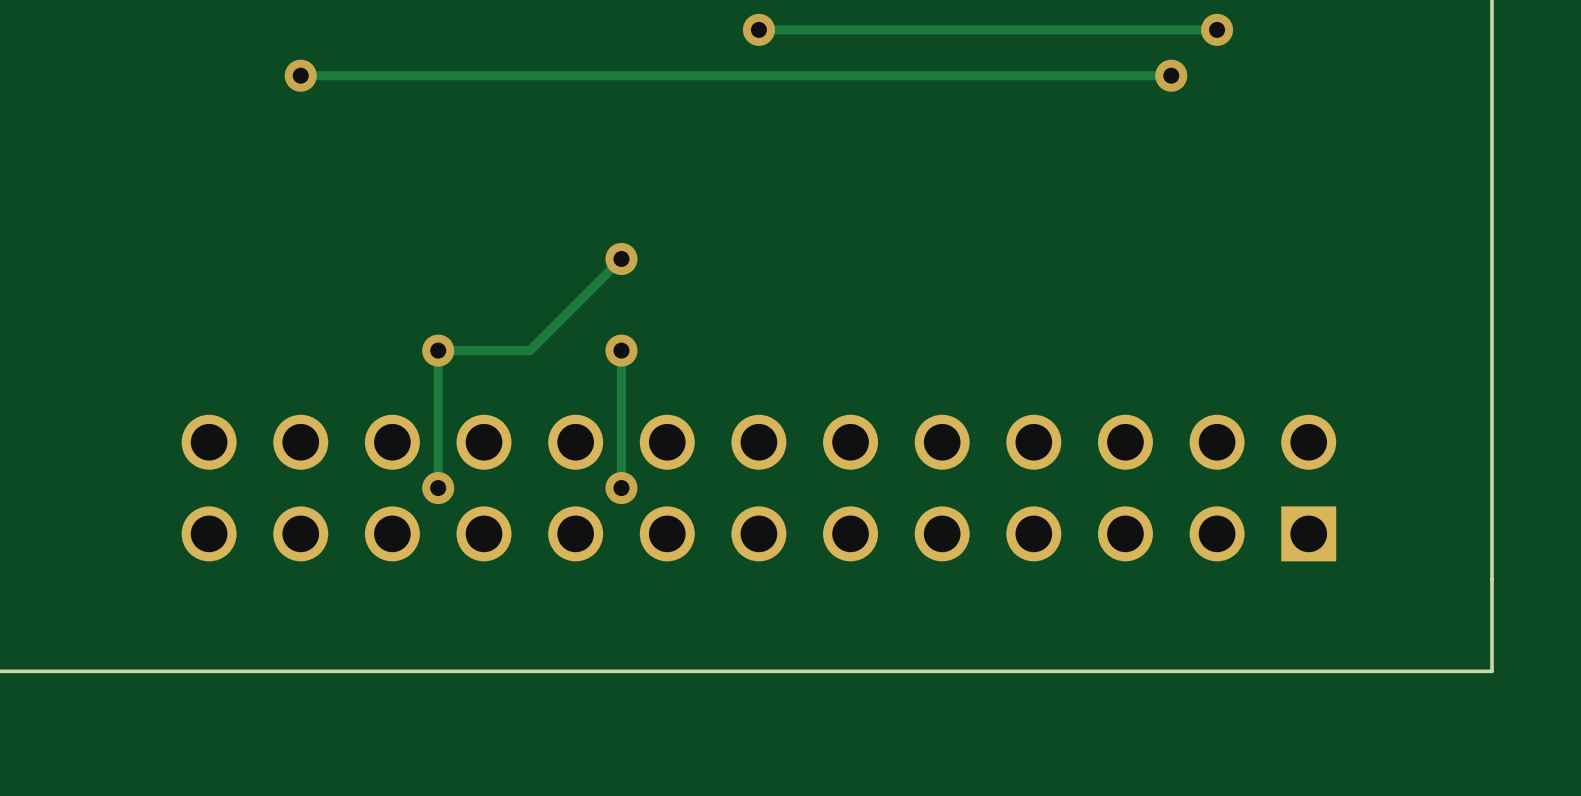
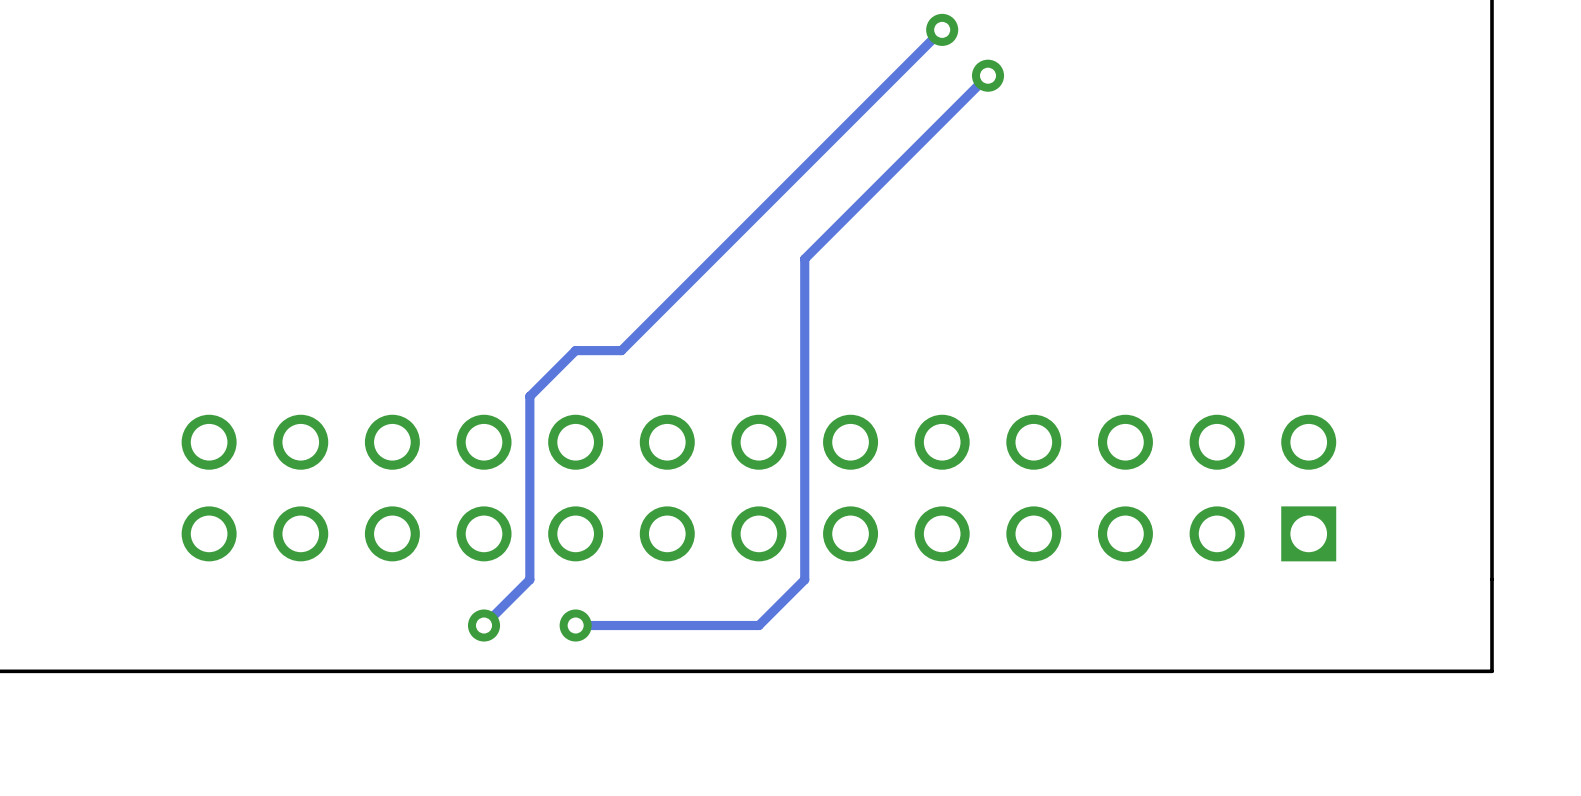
via: (758, 29) -> none
track: none -> (942, 29) (621, 350) (575, 350) (529, 396) (529, 579) (484, 625)
via: none -> (942, 29)
track: (1217, 29) (758, 29) -> none
via: (1217, 29) -> none
via: (300, 75) -> none
track: none -> (988, 75) (804, 258) (804, 579) (758, 625) (575, 625)
via: none -> (988, 75)
track: (1171, 75) (300, 75) -> none
via: (1171, 75) -> none
track: (621, 258) (529, 350) (438, 350) (438, 488) -> none
via: (621, 258) -> none
via: (438, 350) -> none
track: (621, 350) (621, 488) -> none
via: (621, 350) -> none
via: (438, 488) -> none
via: (621, 488) -> none
via: none -> (484, 625)
via: none -> (575, 625)

